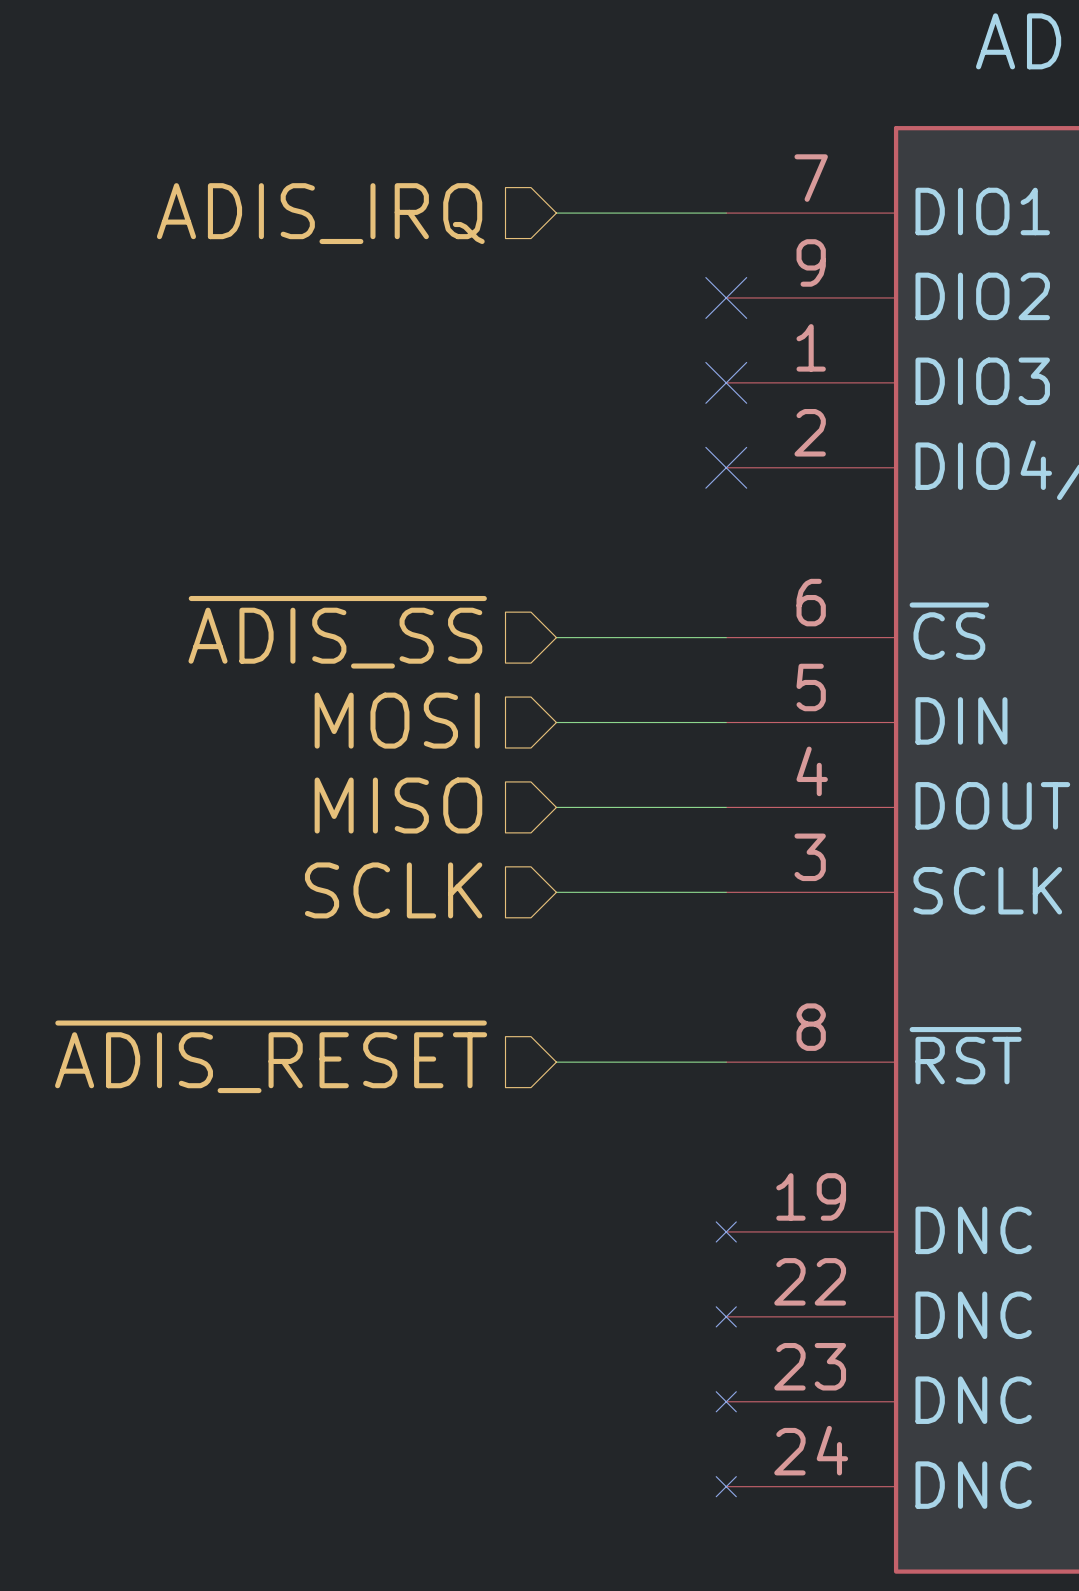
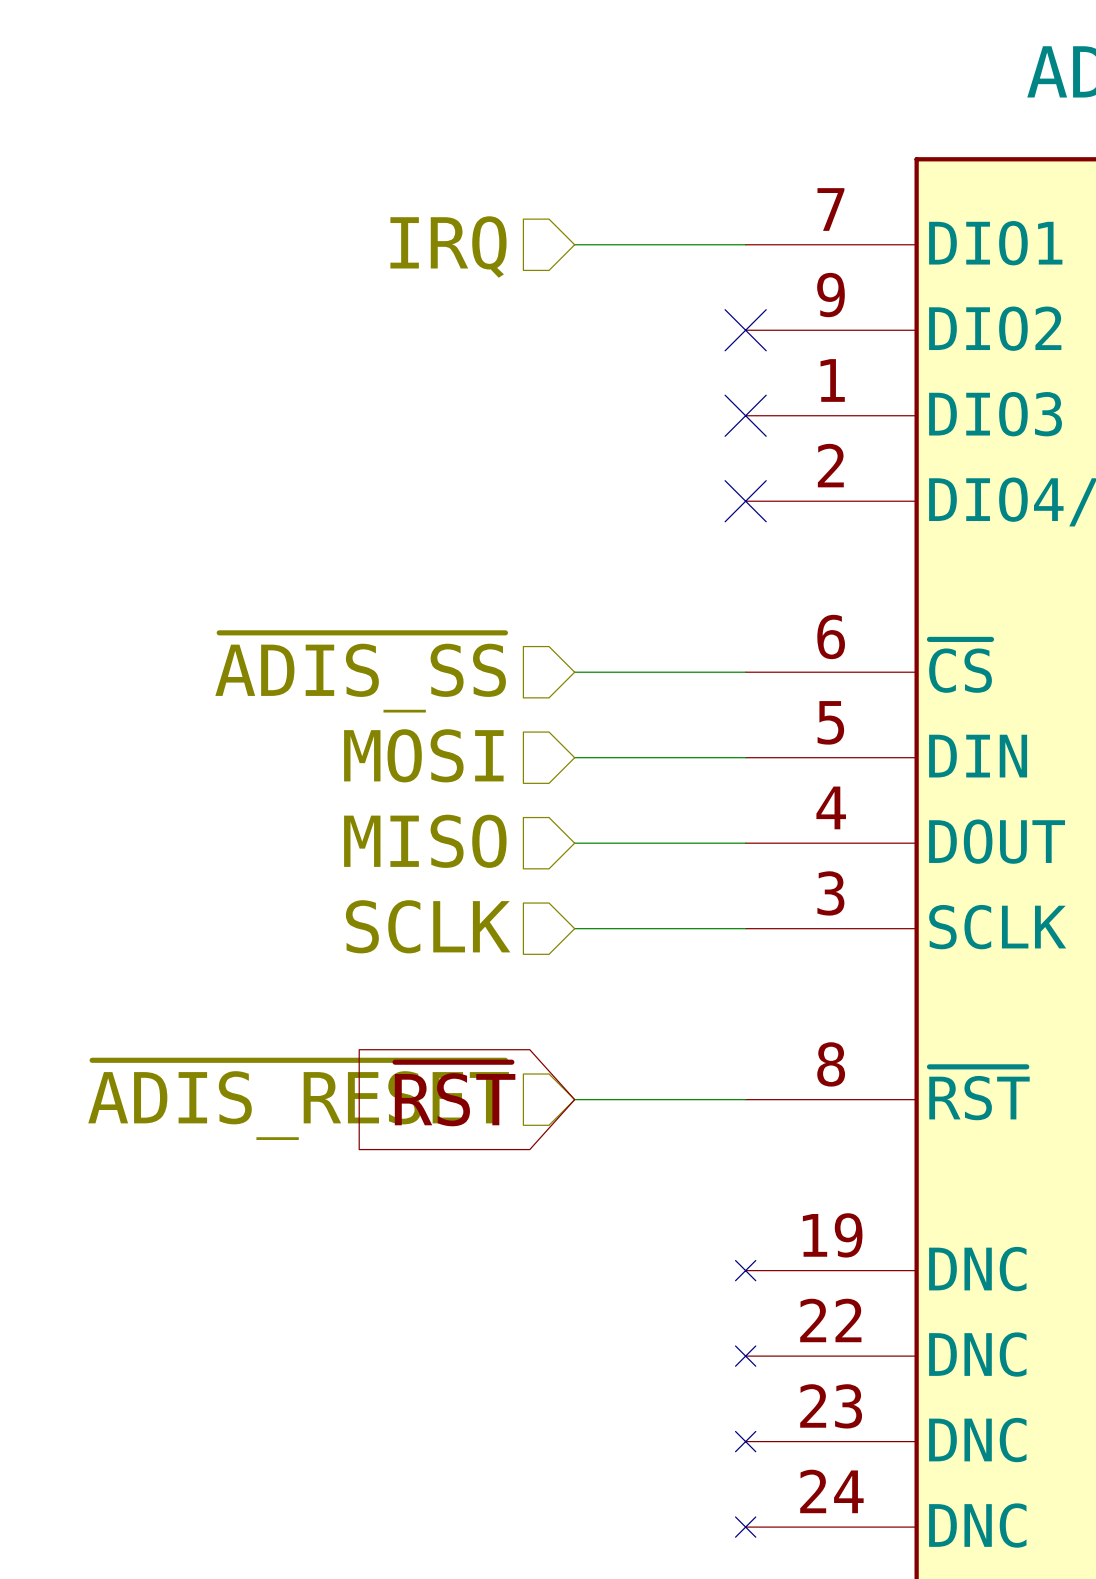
hierarchical label: ADIS_IRQ (320, 213) -> IRQ (448, 247)
global label: none -> ~{RST} (455, 1094)

